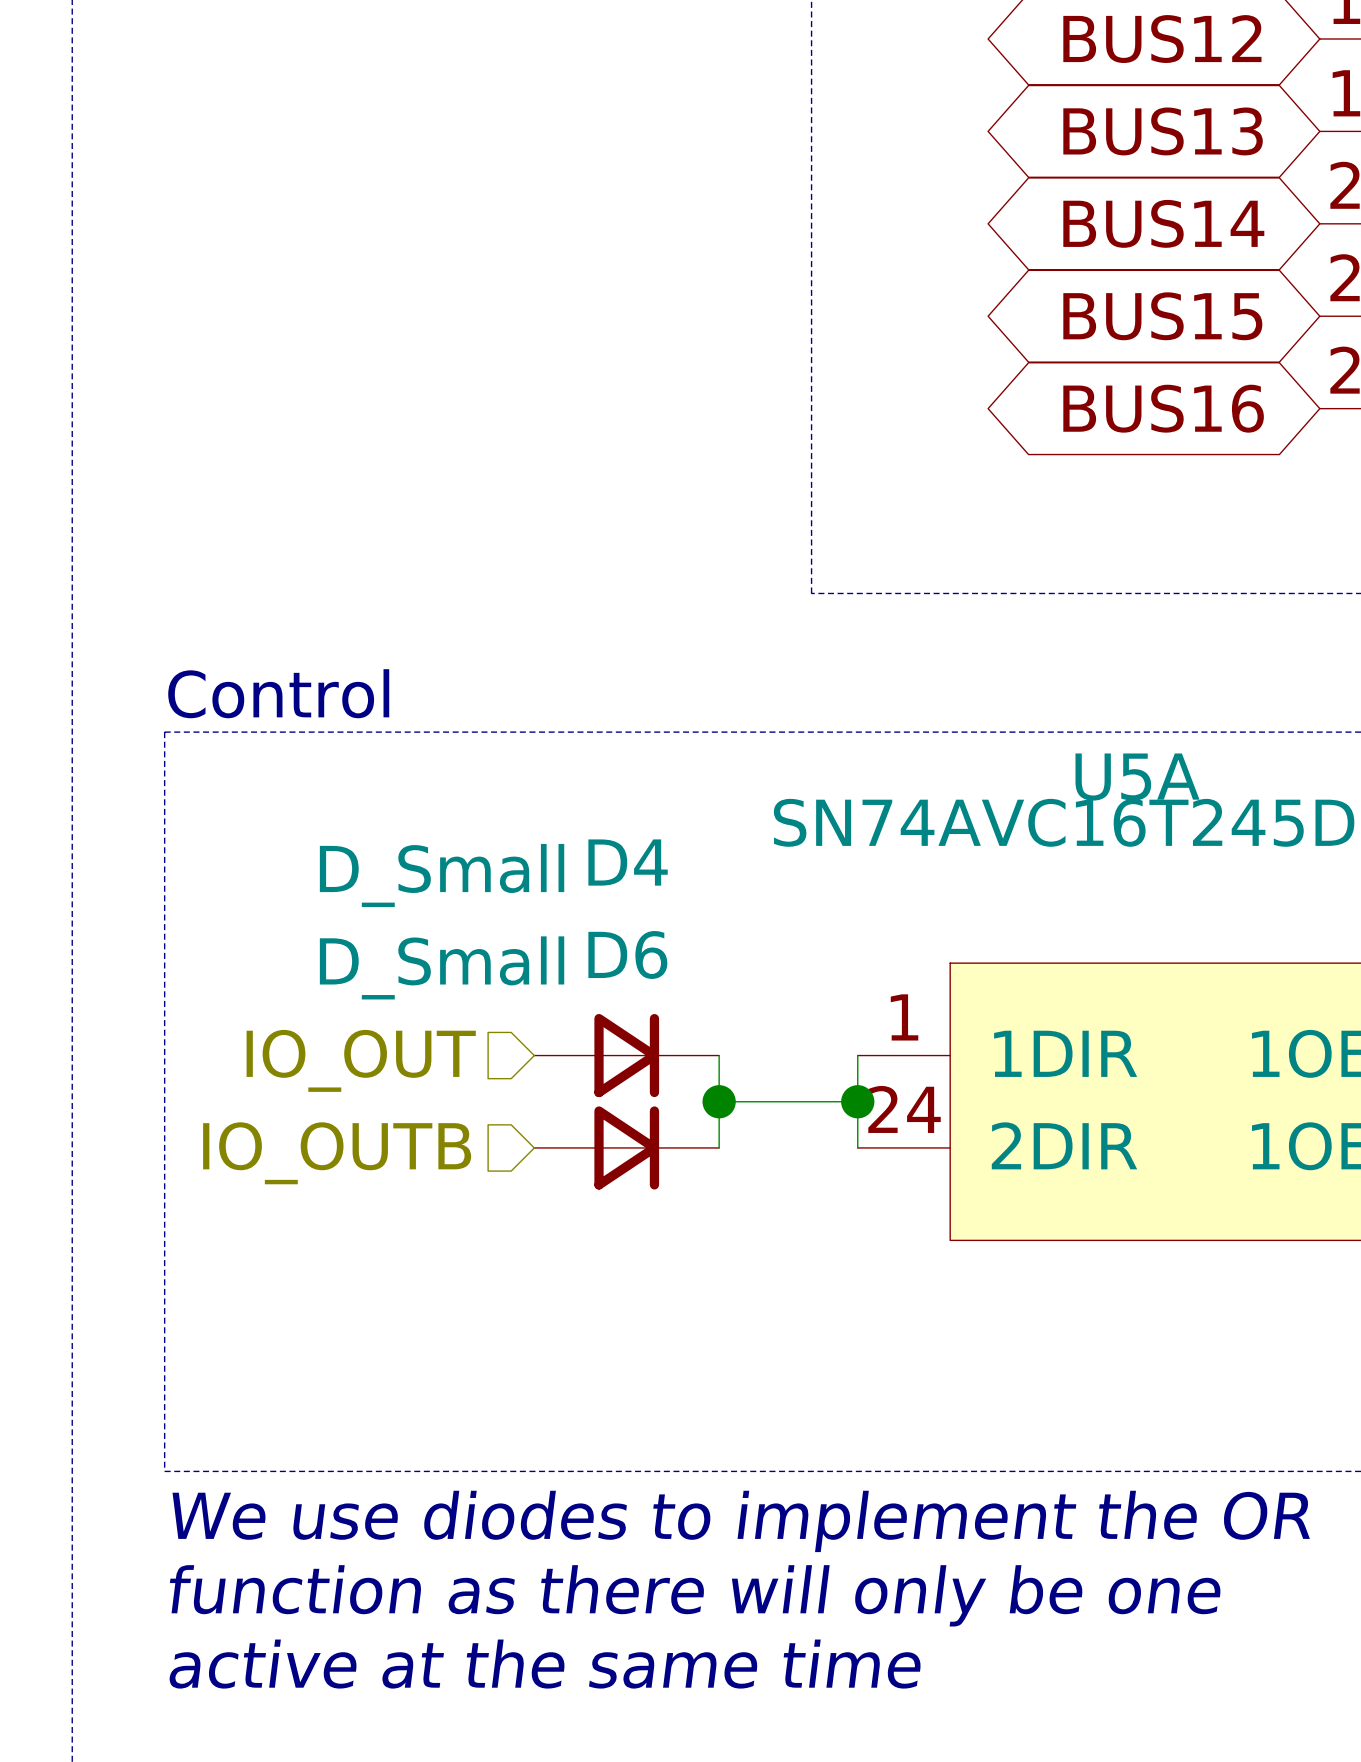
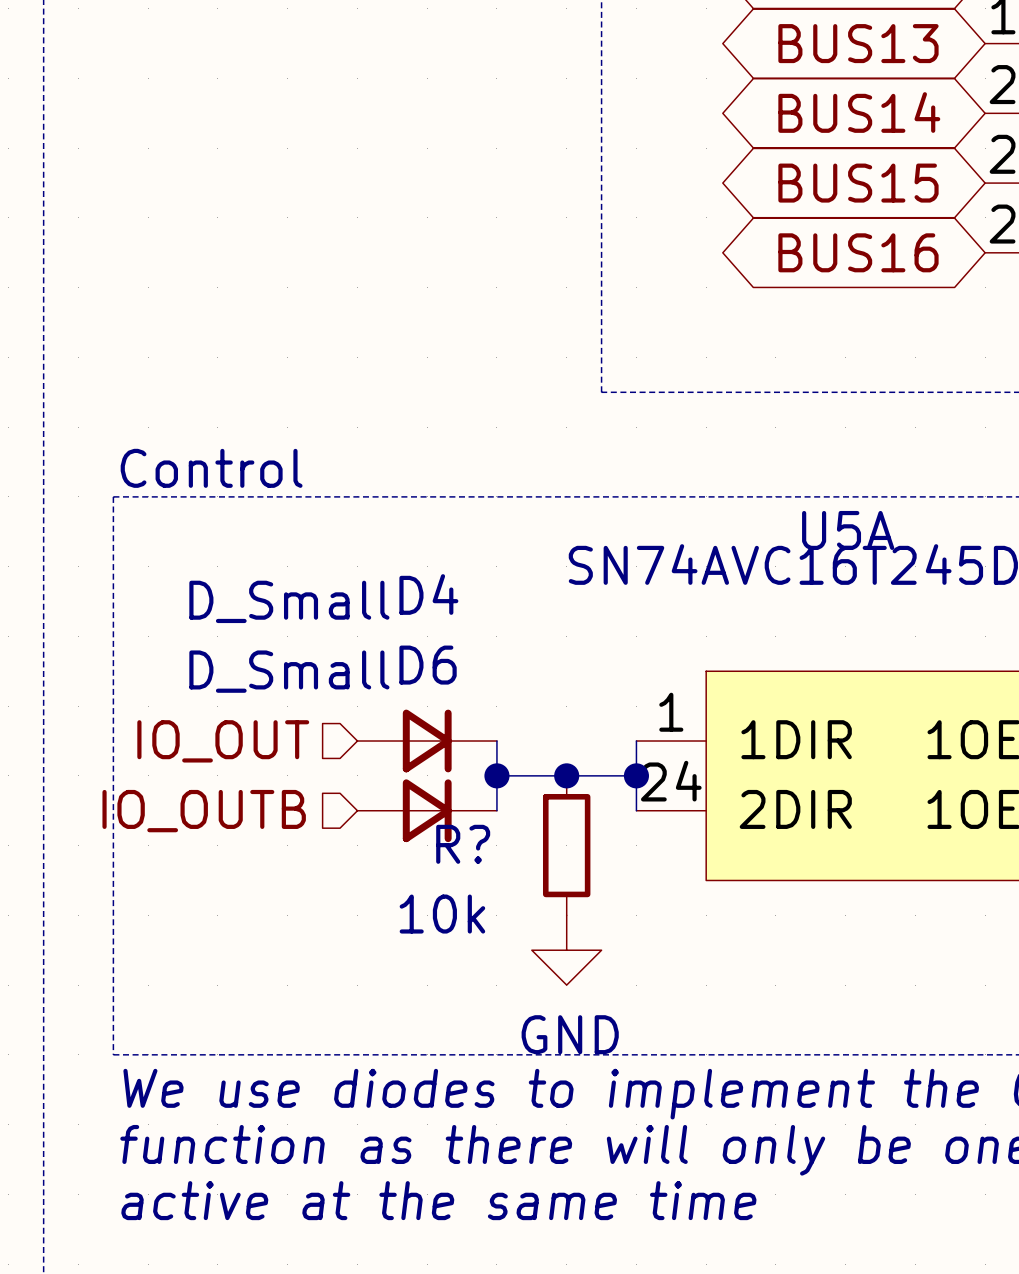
D4 position: (626, 1055) -> (427, 741)
wire: (719, 1055) (719, 1147) -> (496, 741) (496, 810)
hierarchical label position: IO_OUT (361, 1060) -> IO_OUT (223, 741)
wire: none -> (496, 775) (531, 775)
junction: none -> (496, 775)
junction: (719, 1101) -> none
junction: none -> (566, 775)
D6 position: (626, 1147) -> (427, 810)
hierarchical label position: IO_OUTB (337, 1153) -> IO_OUTB (204, 811)
R?: none -> 10k (566, 845)
power symbol: none -> GND (566, 950)

